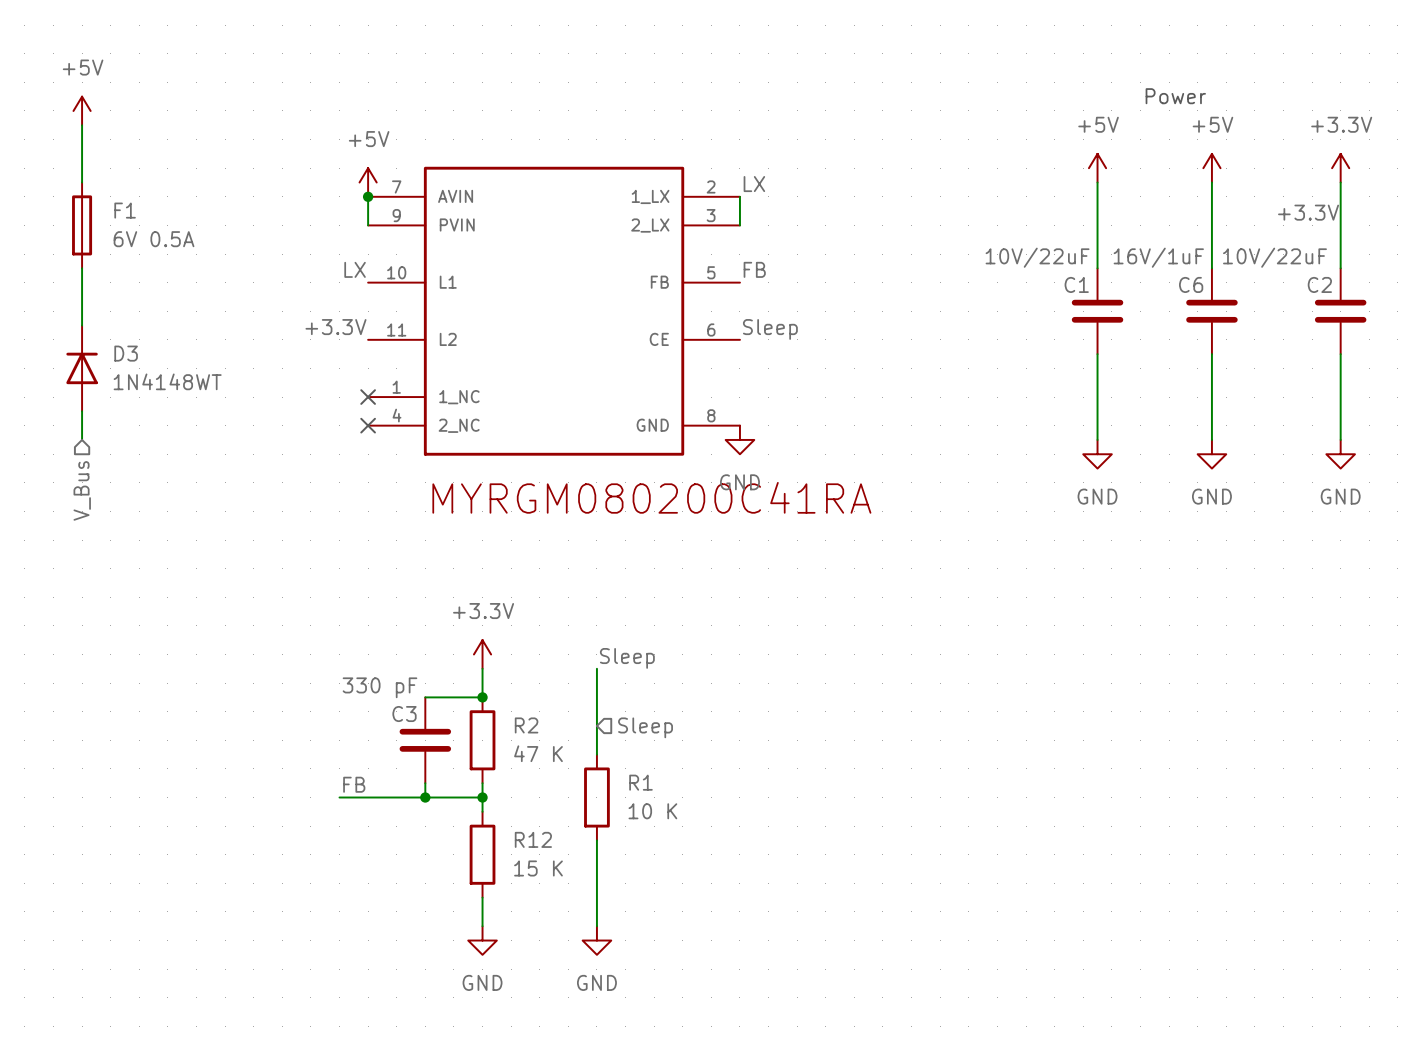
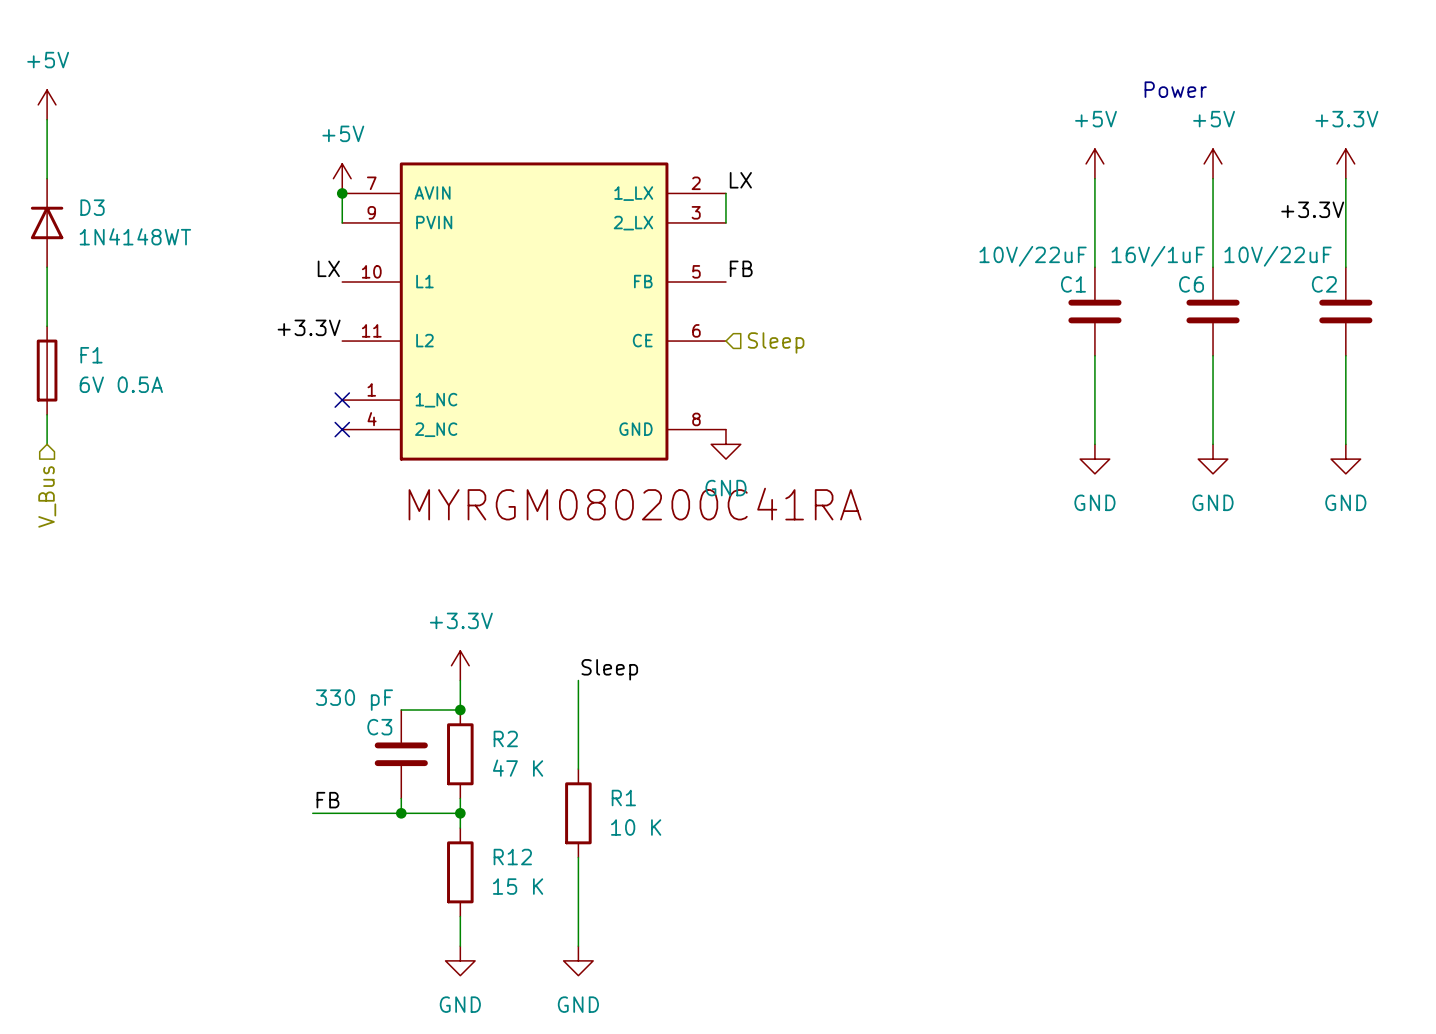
F1 position: (82, 225) -> (47, 370)
label: Sleep (770, 329) -> none
hierarchical label: none -> Sleep (776, 342)
D3 position: (82, 368) -> (47, 222)
hierarchical label: Sleep (645, 727) -> none

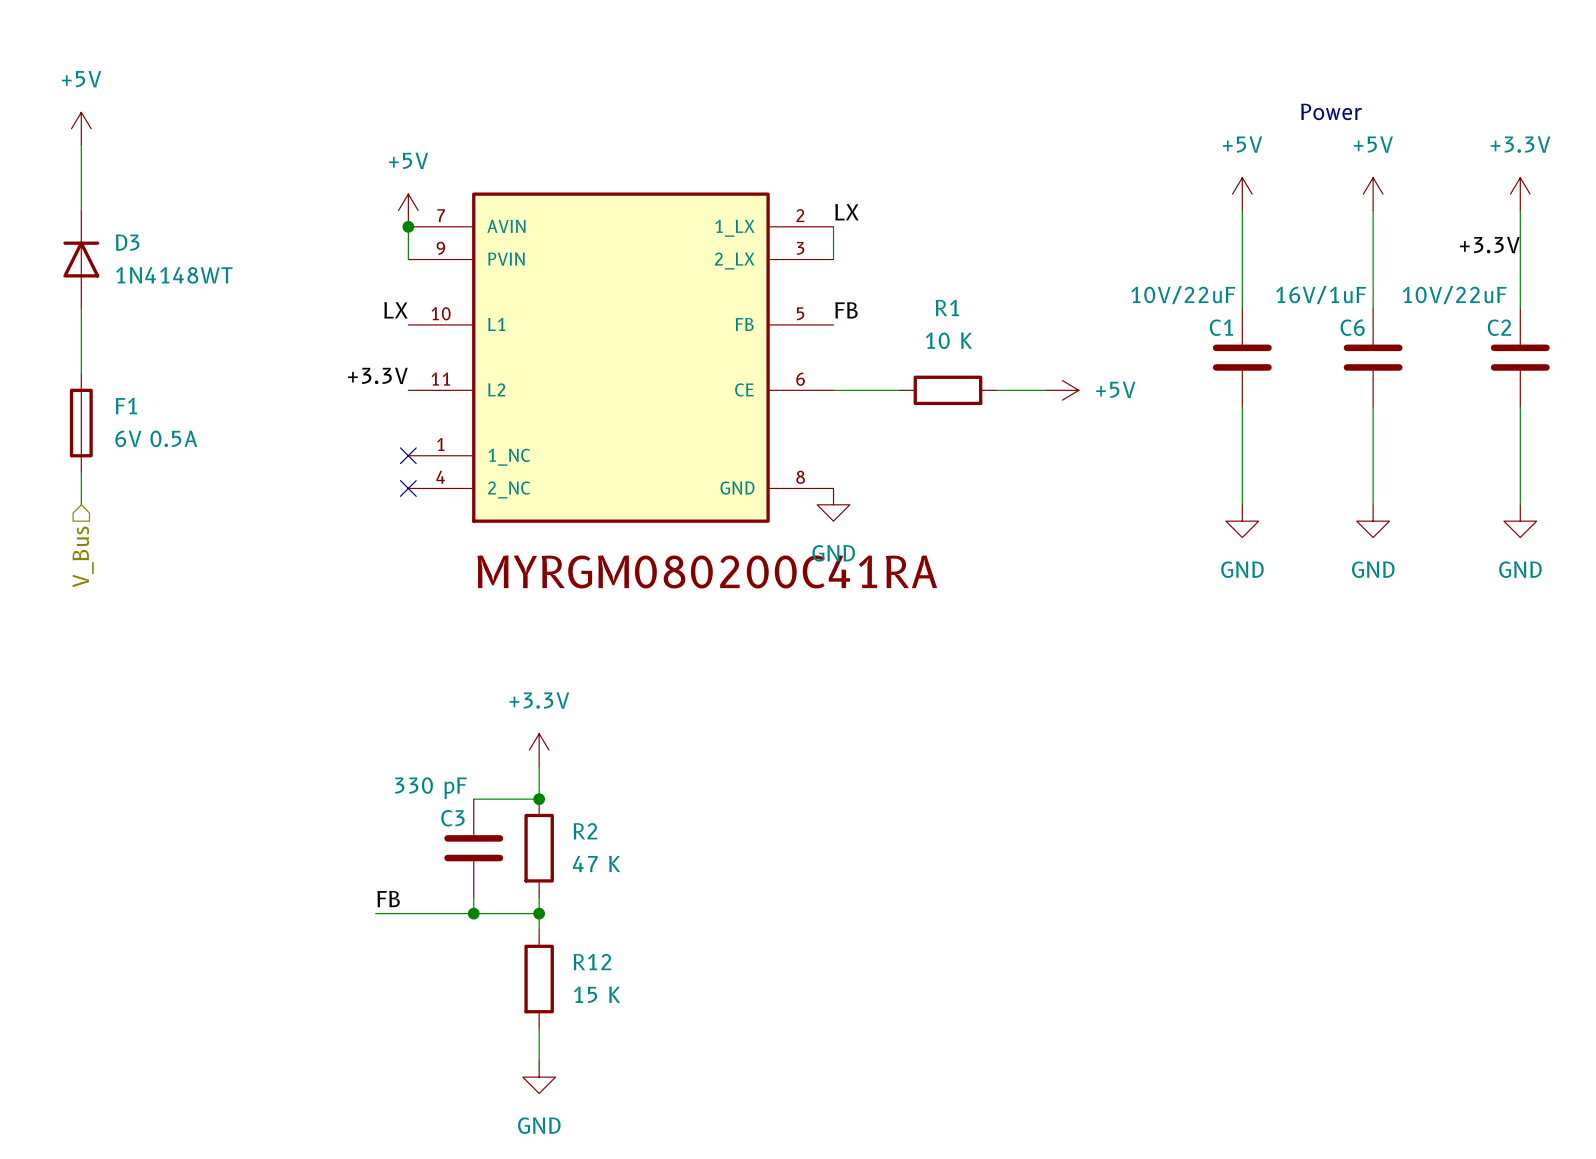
wire: none -> (833, 390) (898, 390)
wire: none -> (997, 390) (1046, 390)
power symbol: none -> +5V (1062, 390)
hierarchical label: Sleep (776, 342) -> none
label: Sleep (609, 669) -> none
wire: (578, 680) (578, 769) -> none
R1 name position: R1 (623, 798) -> R1 (947, 307)
R1 rotation: 0° (578, 813) -> 90° clockwise (947, 390)
R1 position: (578, 813) -> (947, 390)
R1 value position: 10 K (636, 827) -> 10 K (948, 340)
wire: (578, 857) (578, 946) -> none
power symbol: GND (578, 960) -> none

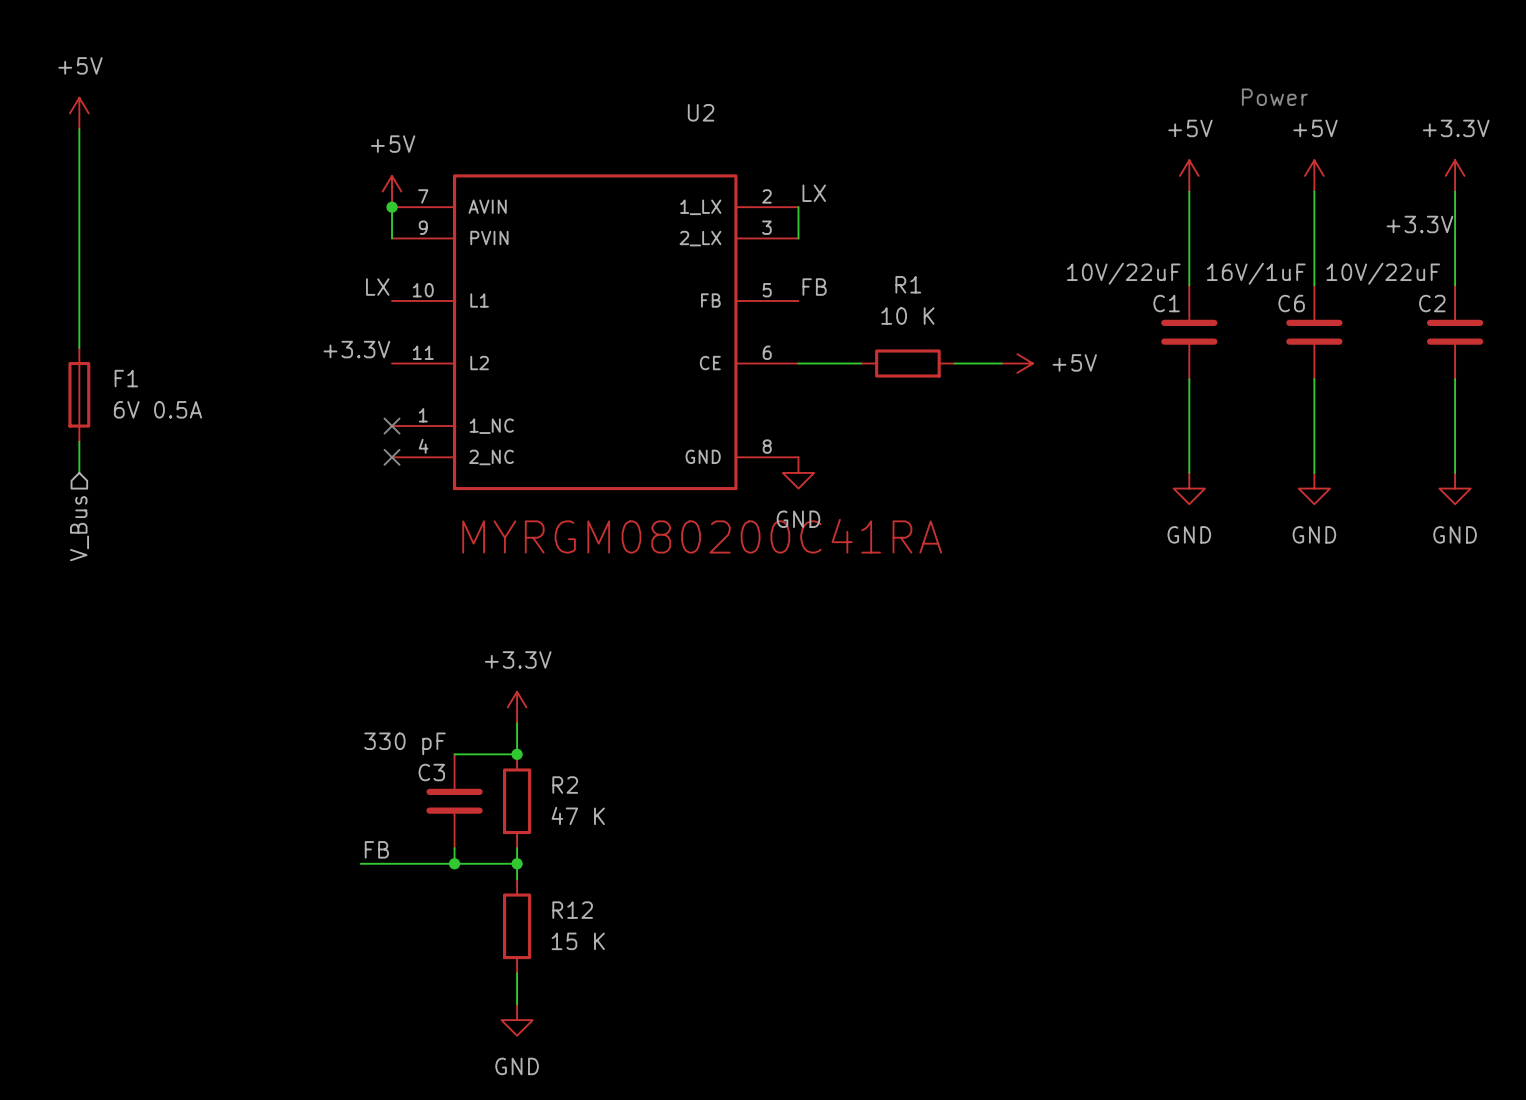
U2 name: none -> U2 (701, 112)
D3: 1N4148WT (81, 259) -> none

